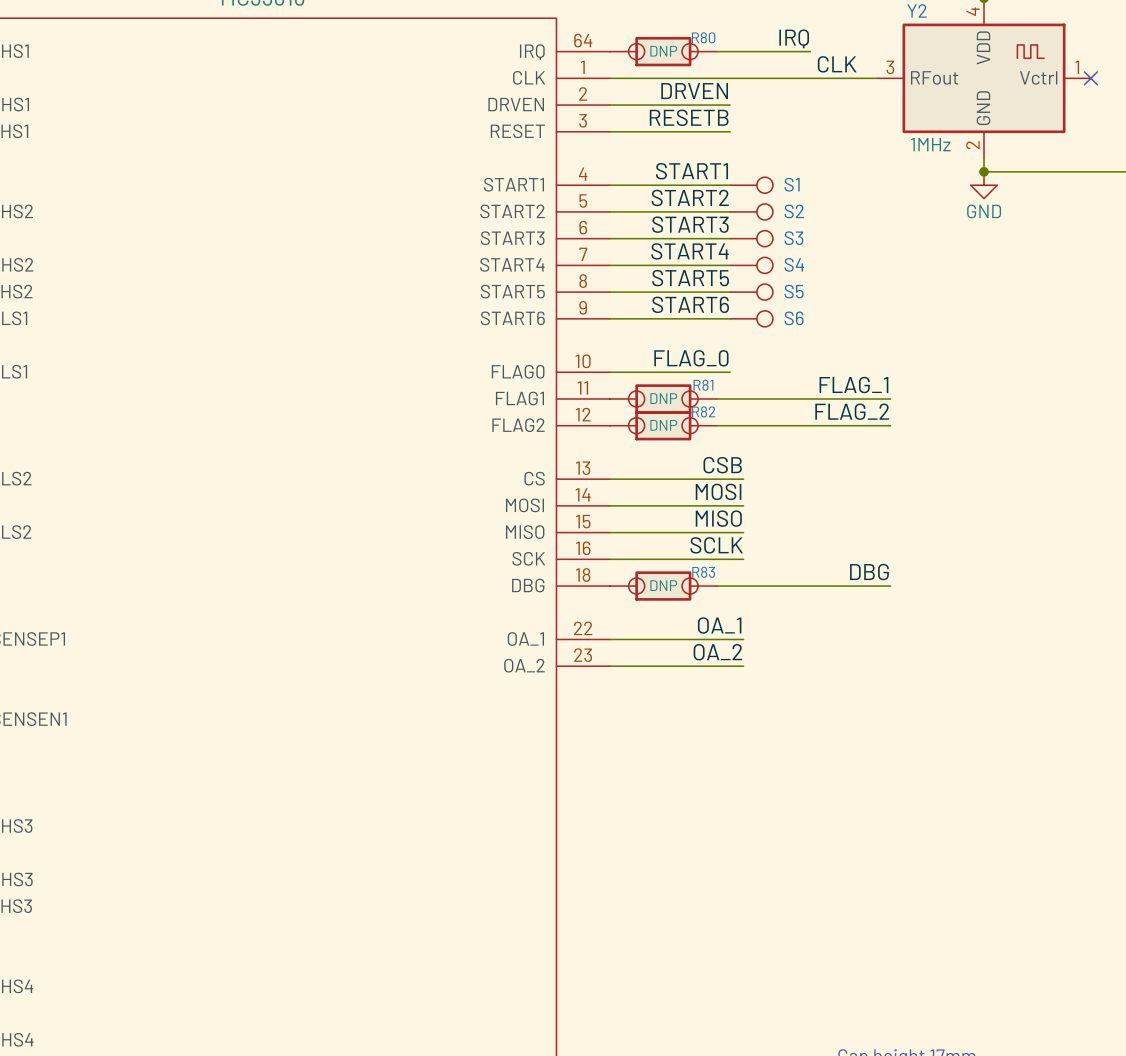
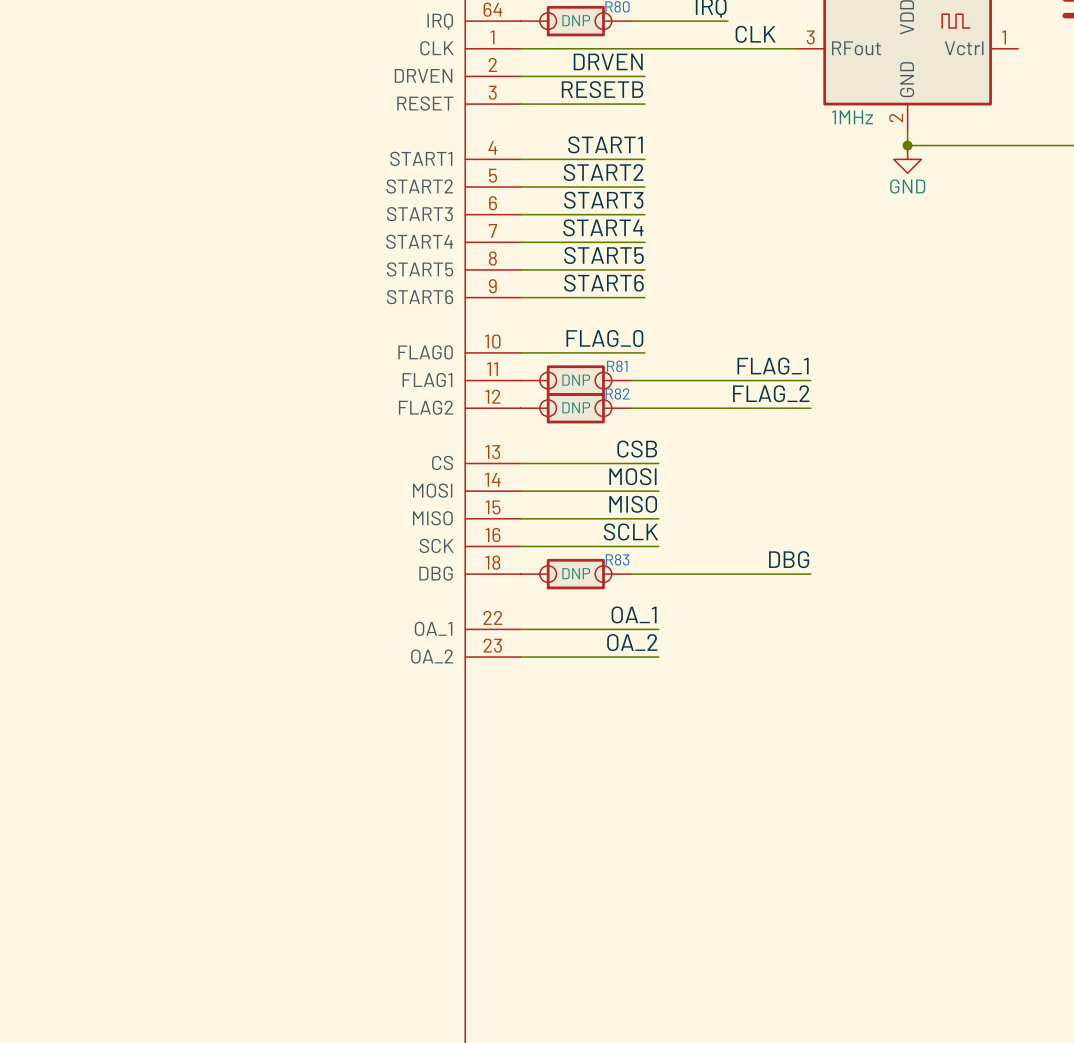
no-connect mark: (1090, 78) -> none
S1: (751, 185) -> none
S2: (751, 211) -> none
S3: (751, 238) -> none
S4: (751, 265) -> none
S5: (751, 292) -> none
S6: (751, 318) -> none

